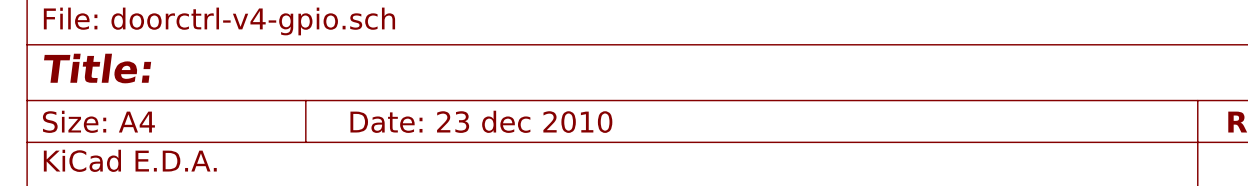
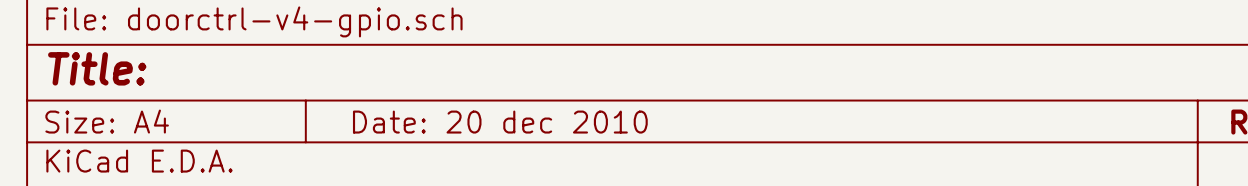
title block: Date: 23 dec 2010 (481, 121) -> Date: 20 dec 2010 (500, 122)

